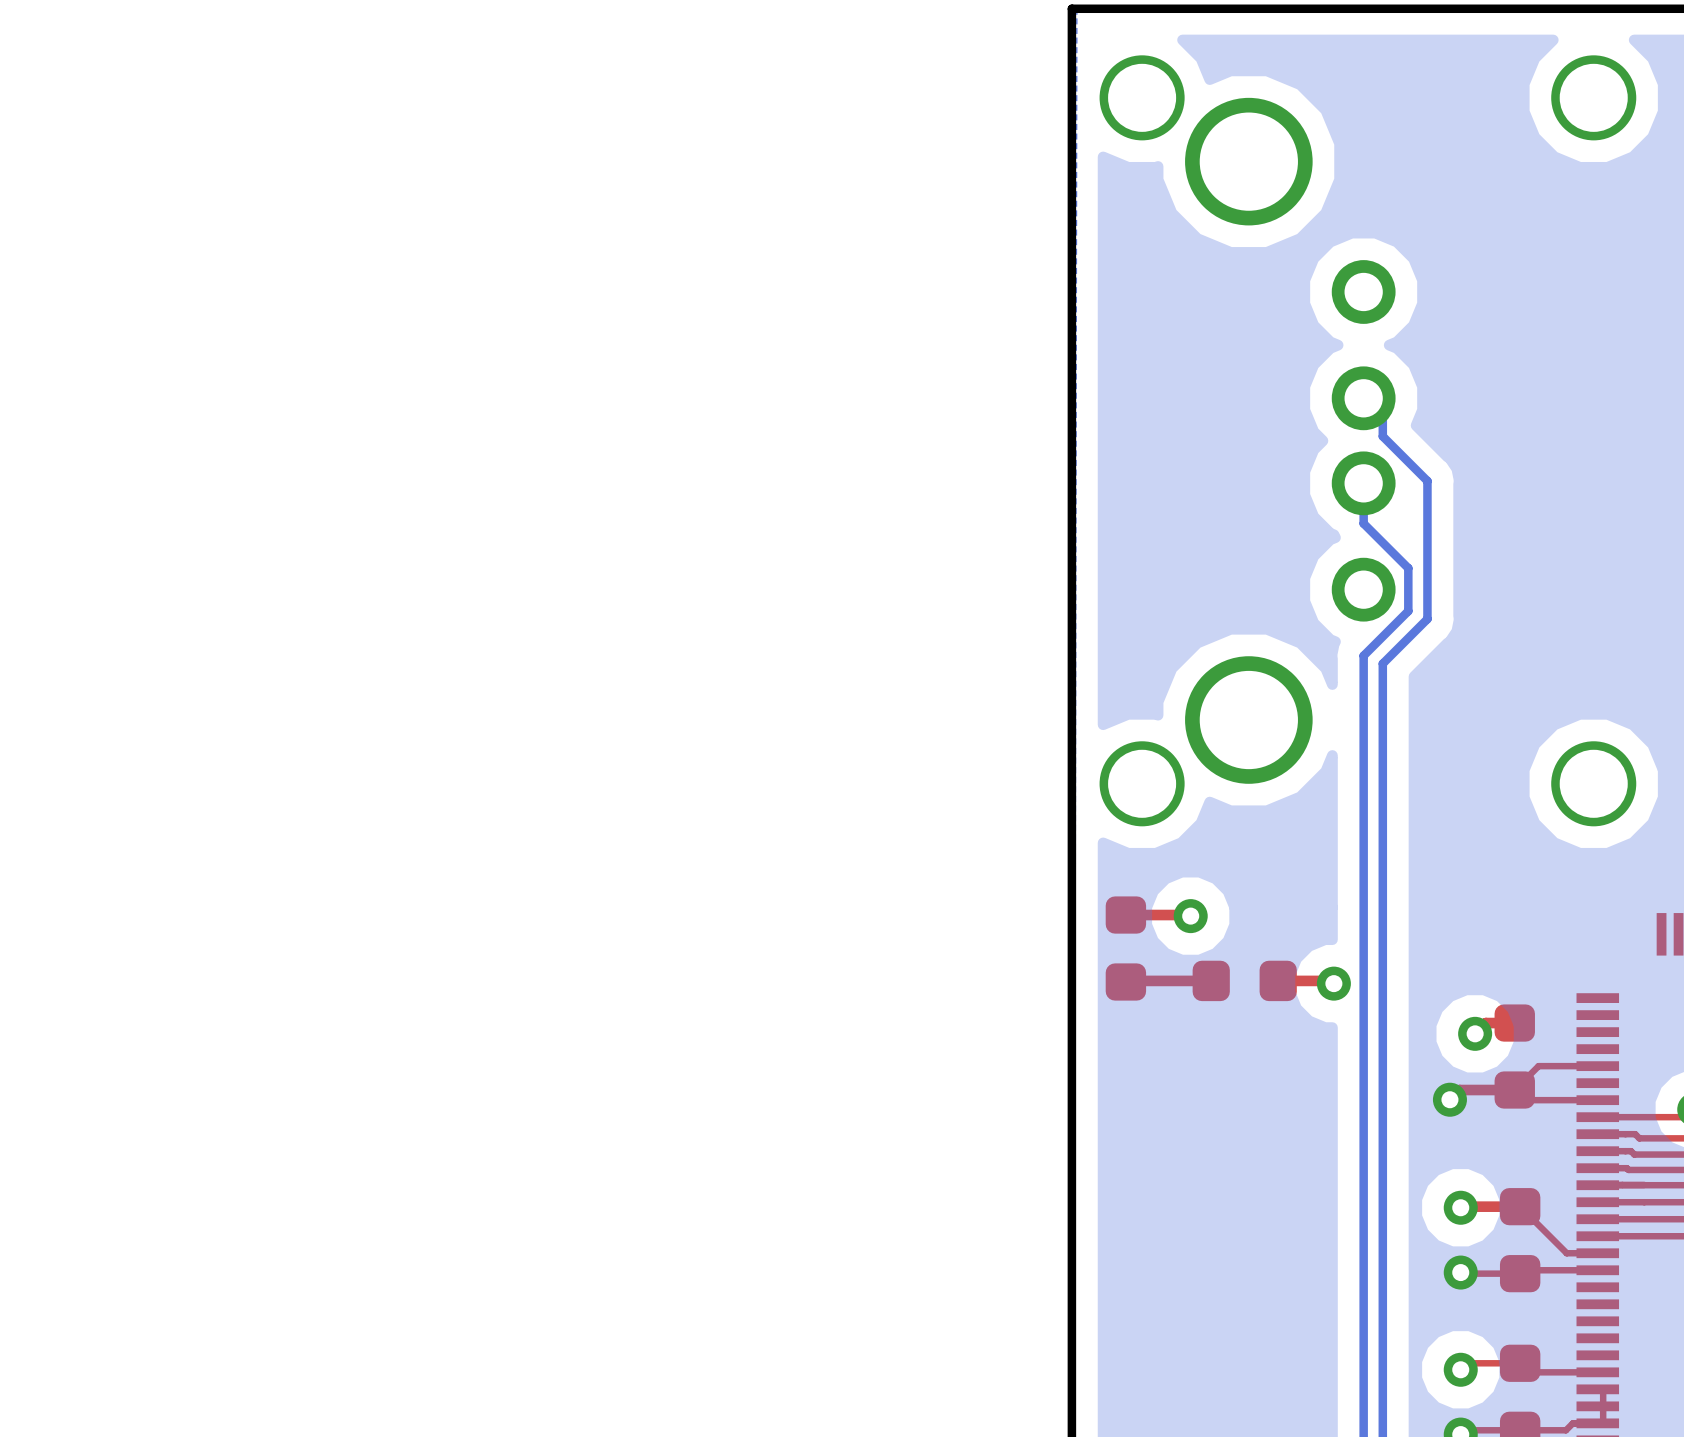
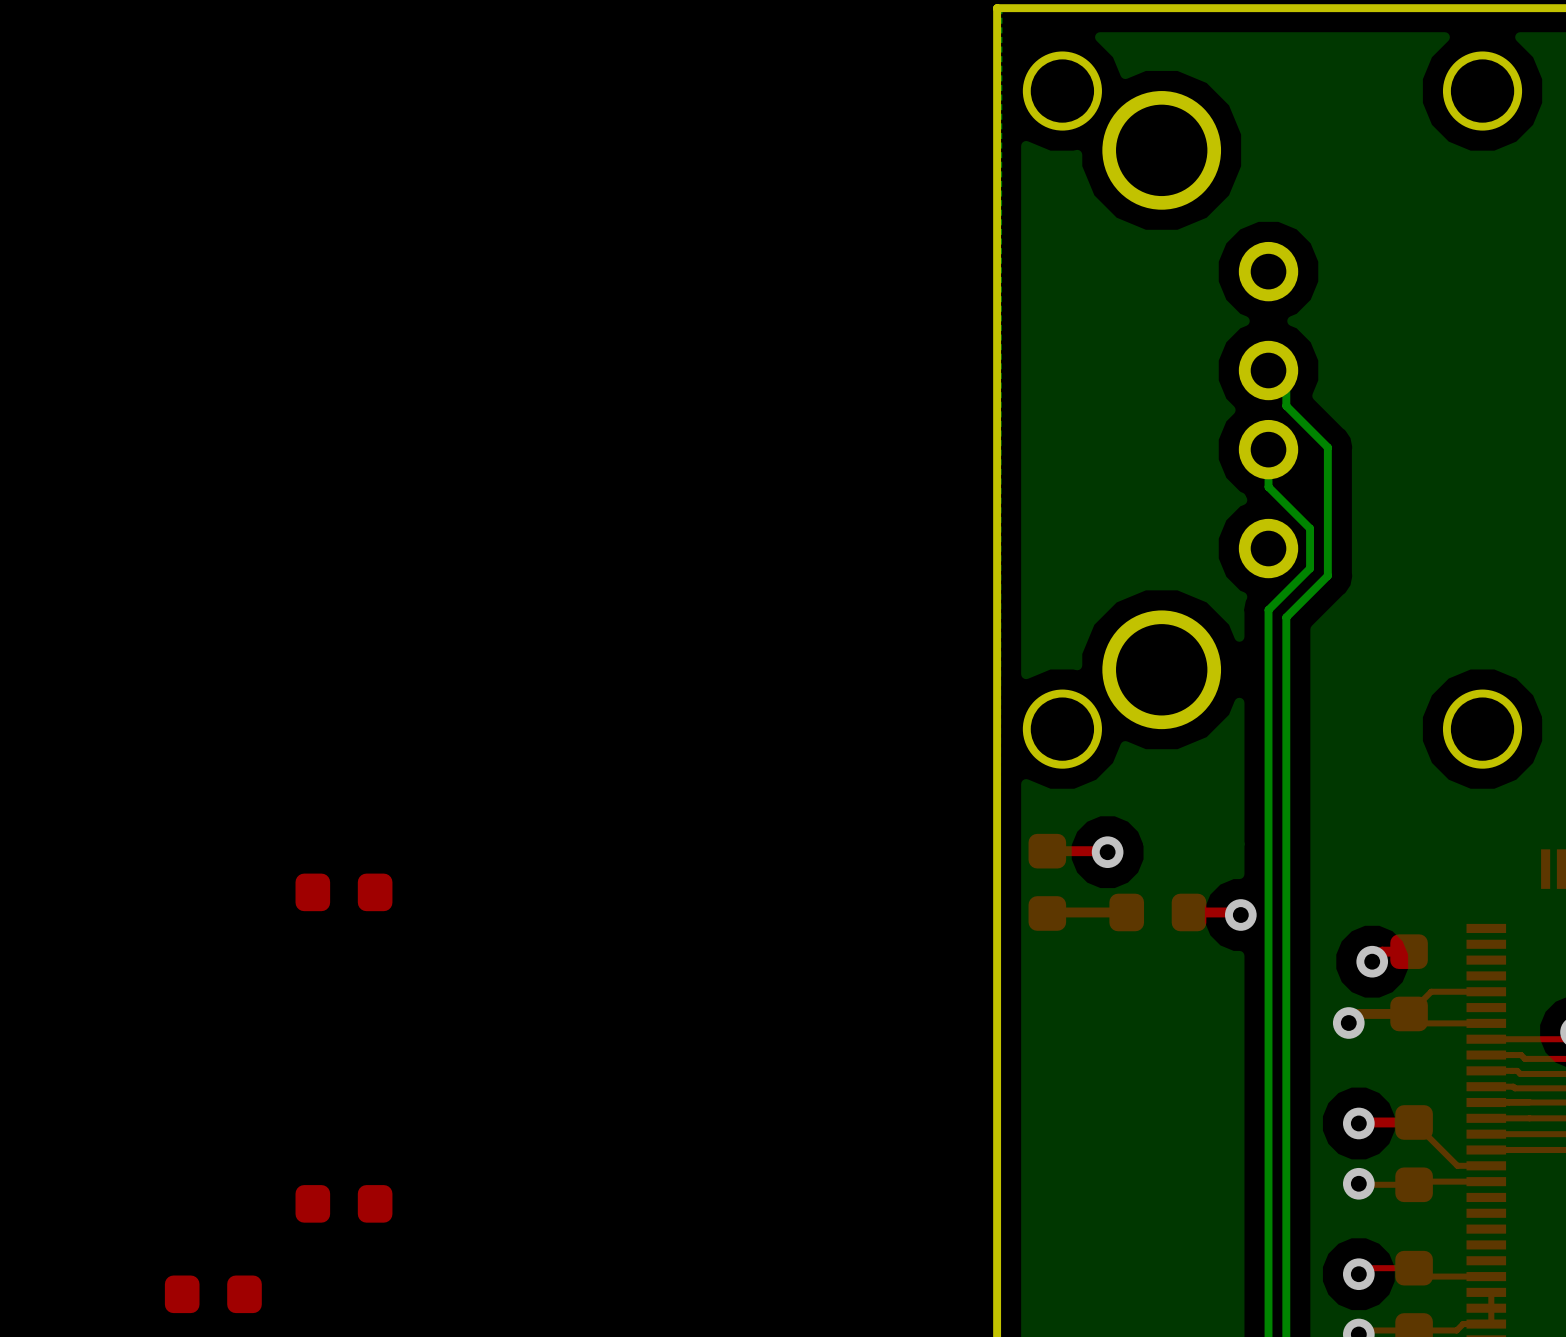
part: none -> (343, 892)
part: none -> (343, 1203)
part: none -> (213, 1294)

